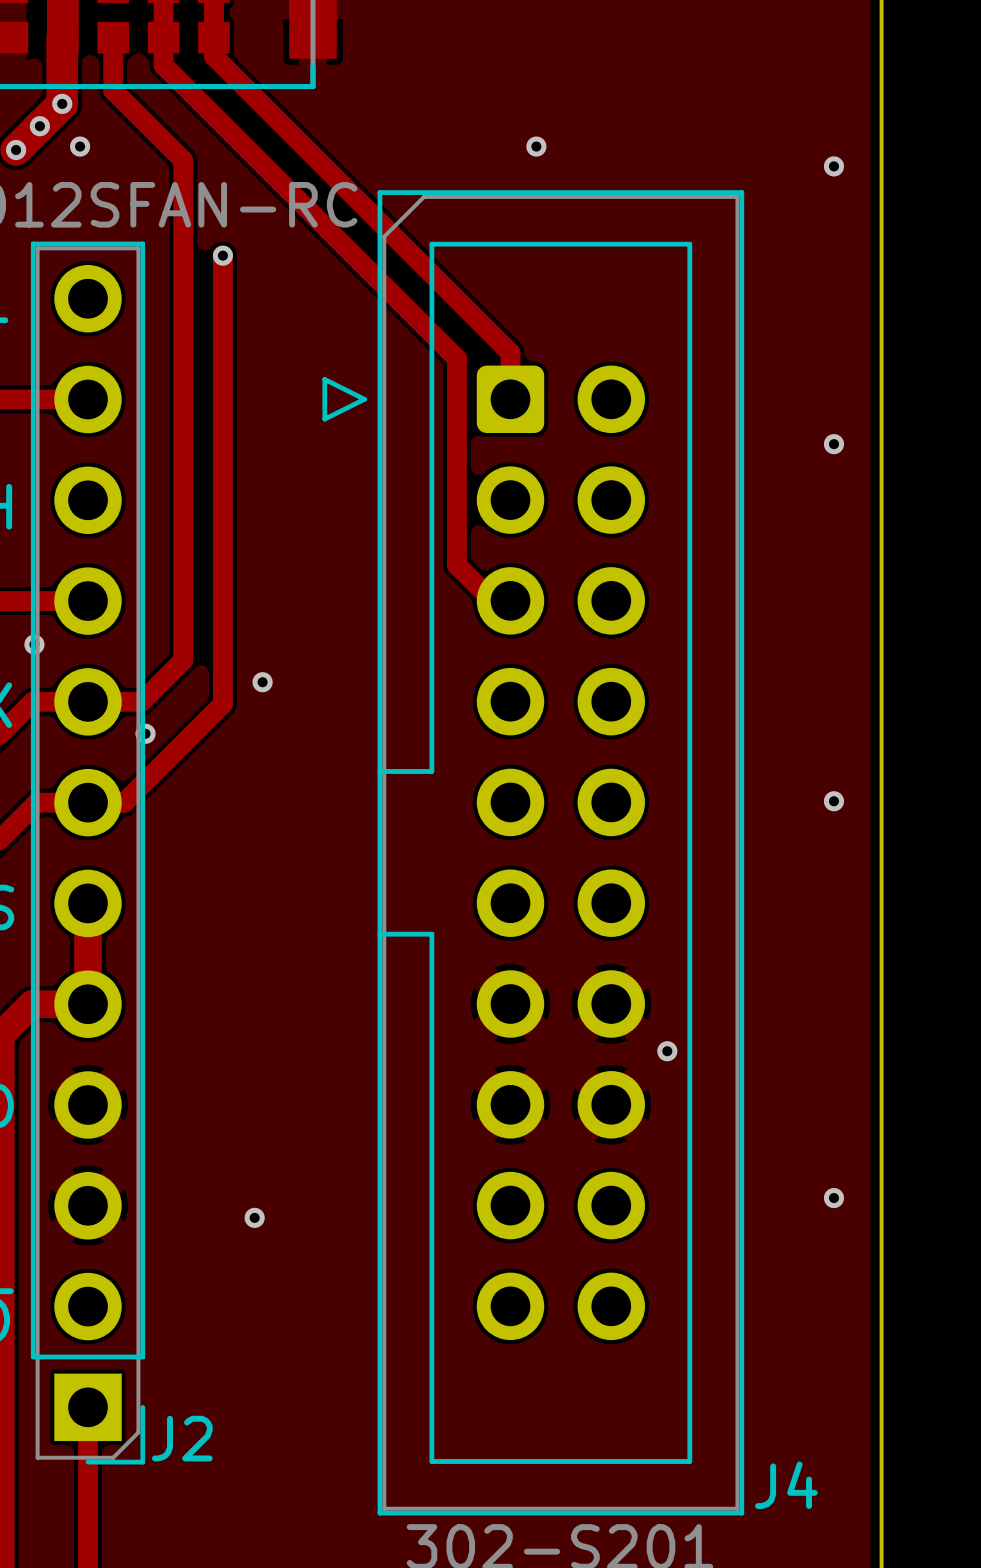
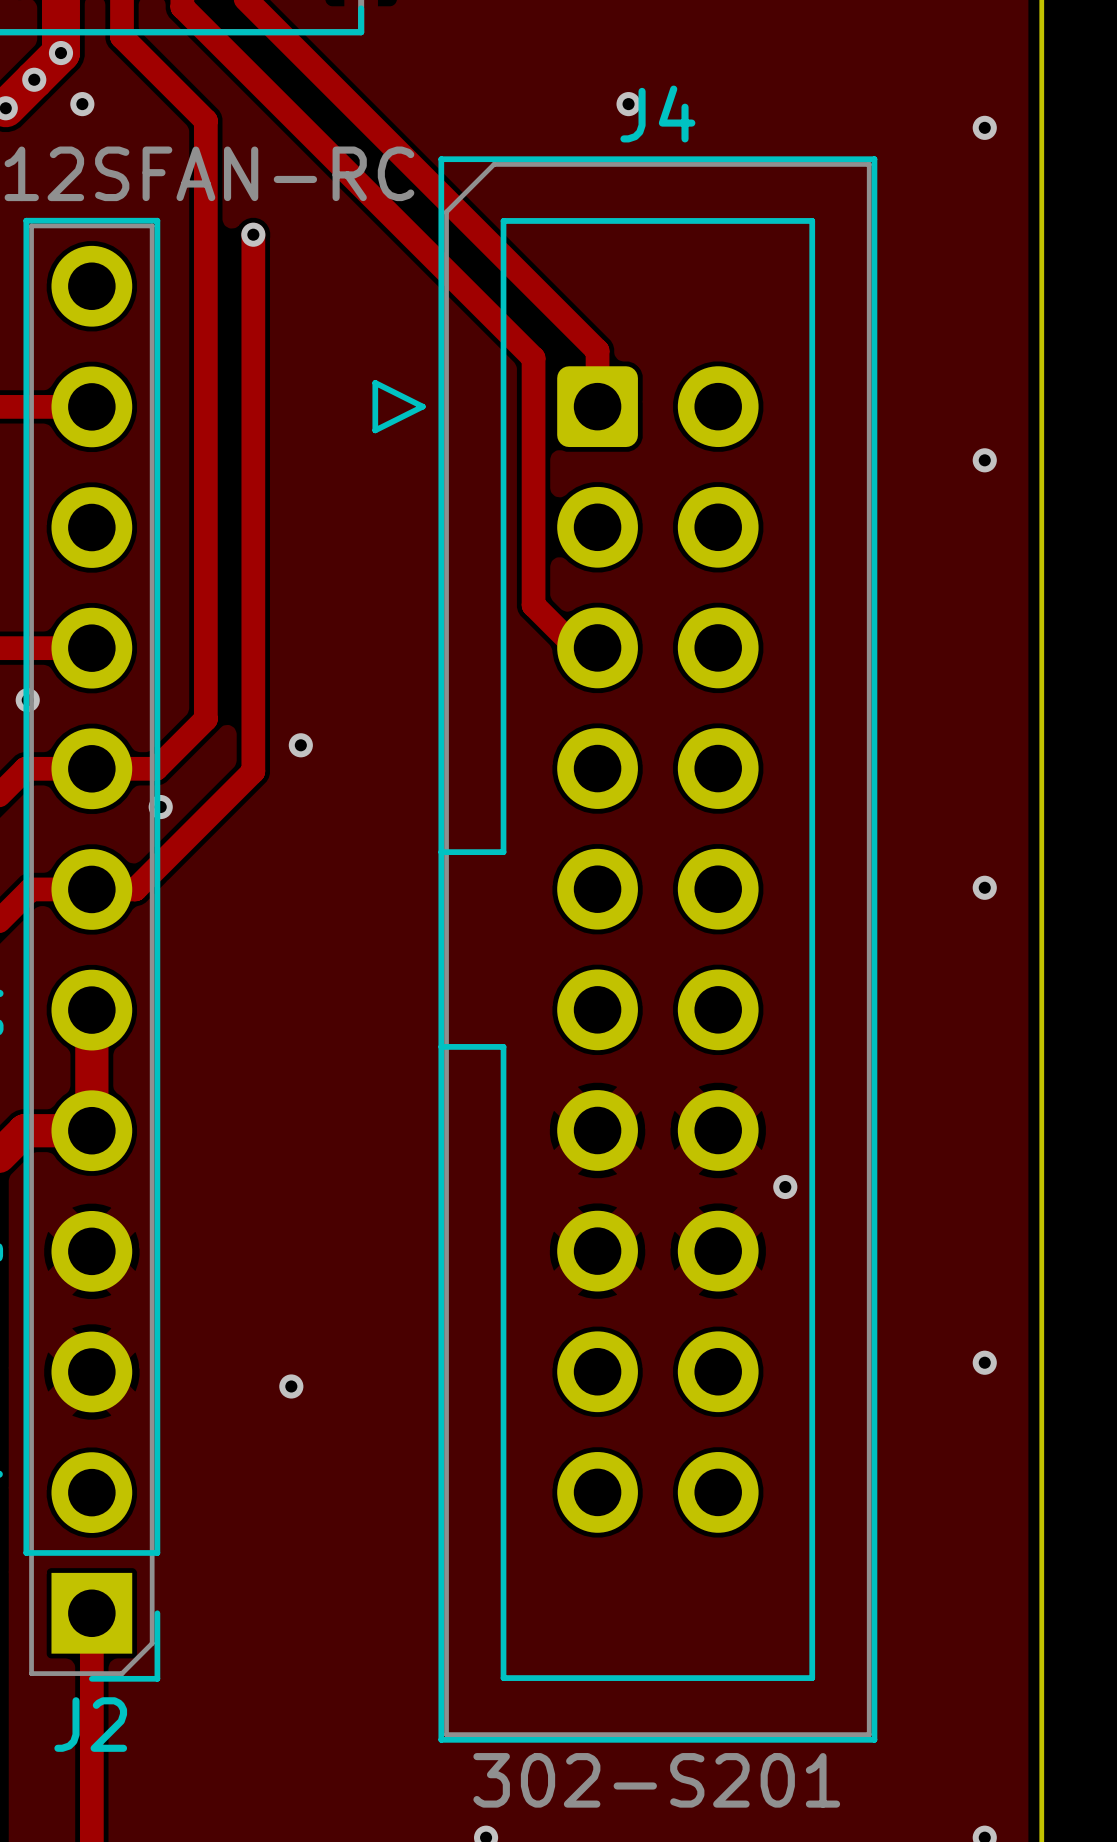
J2 name position: J2 (182, 1438) -> J2 (90, 1724)
J4 name position: J4 (786, 1485) -> J4 (657, 114)

